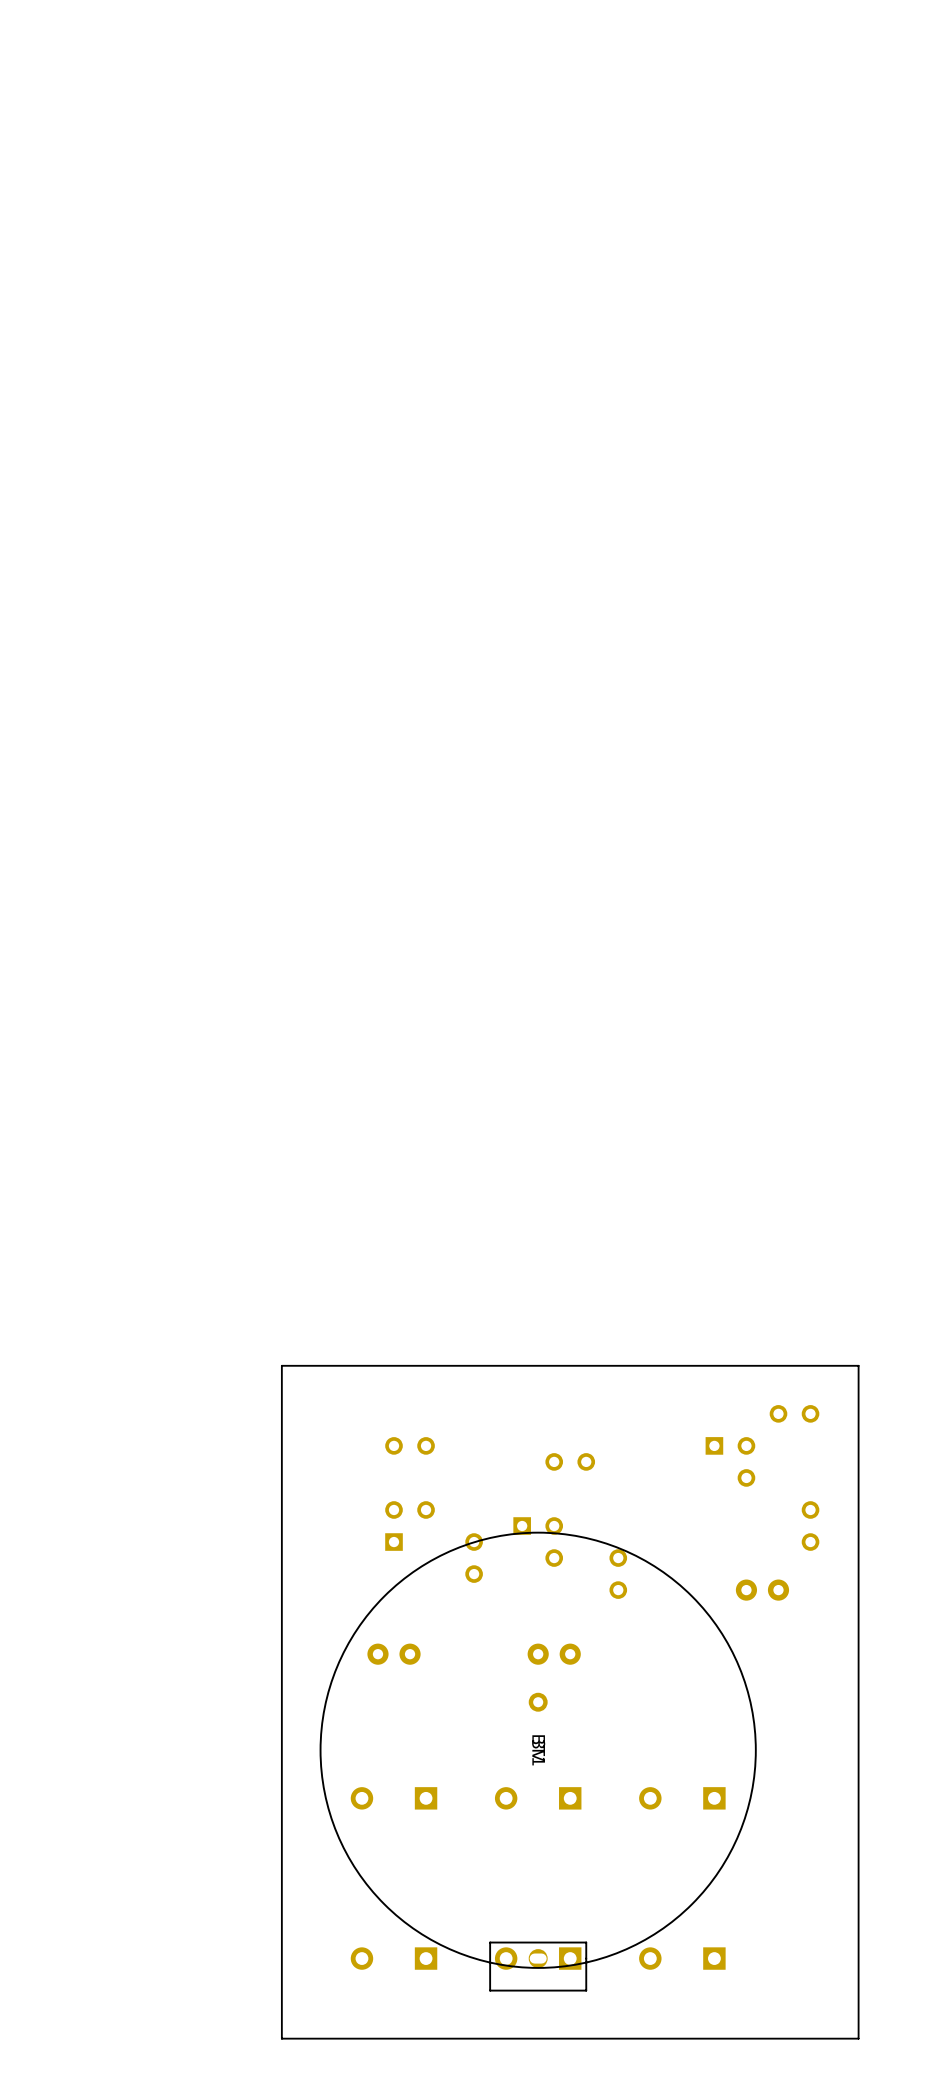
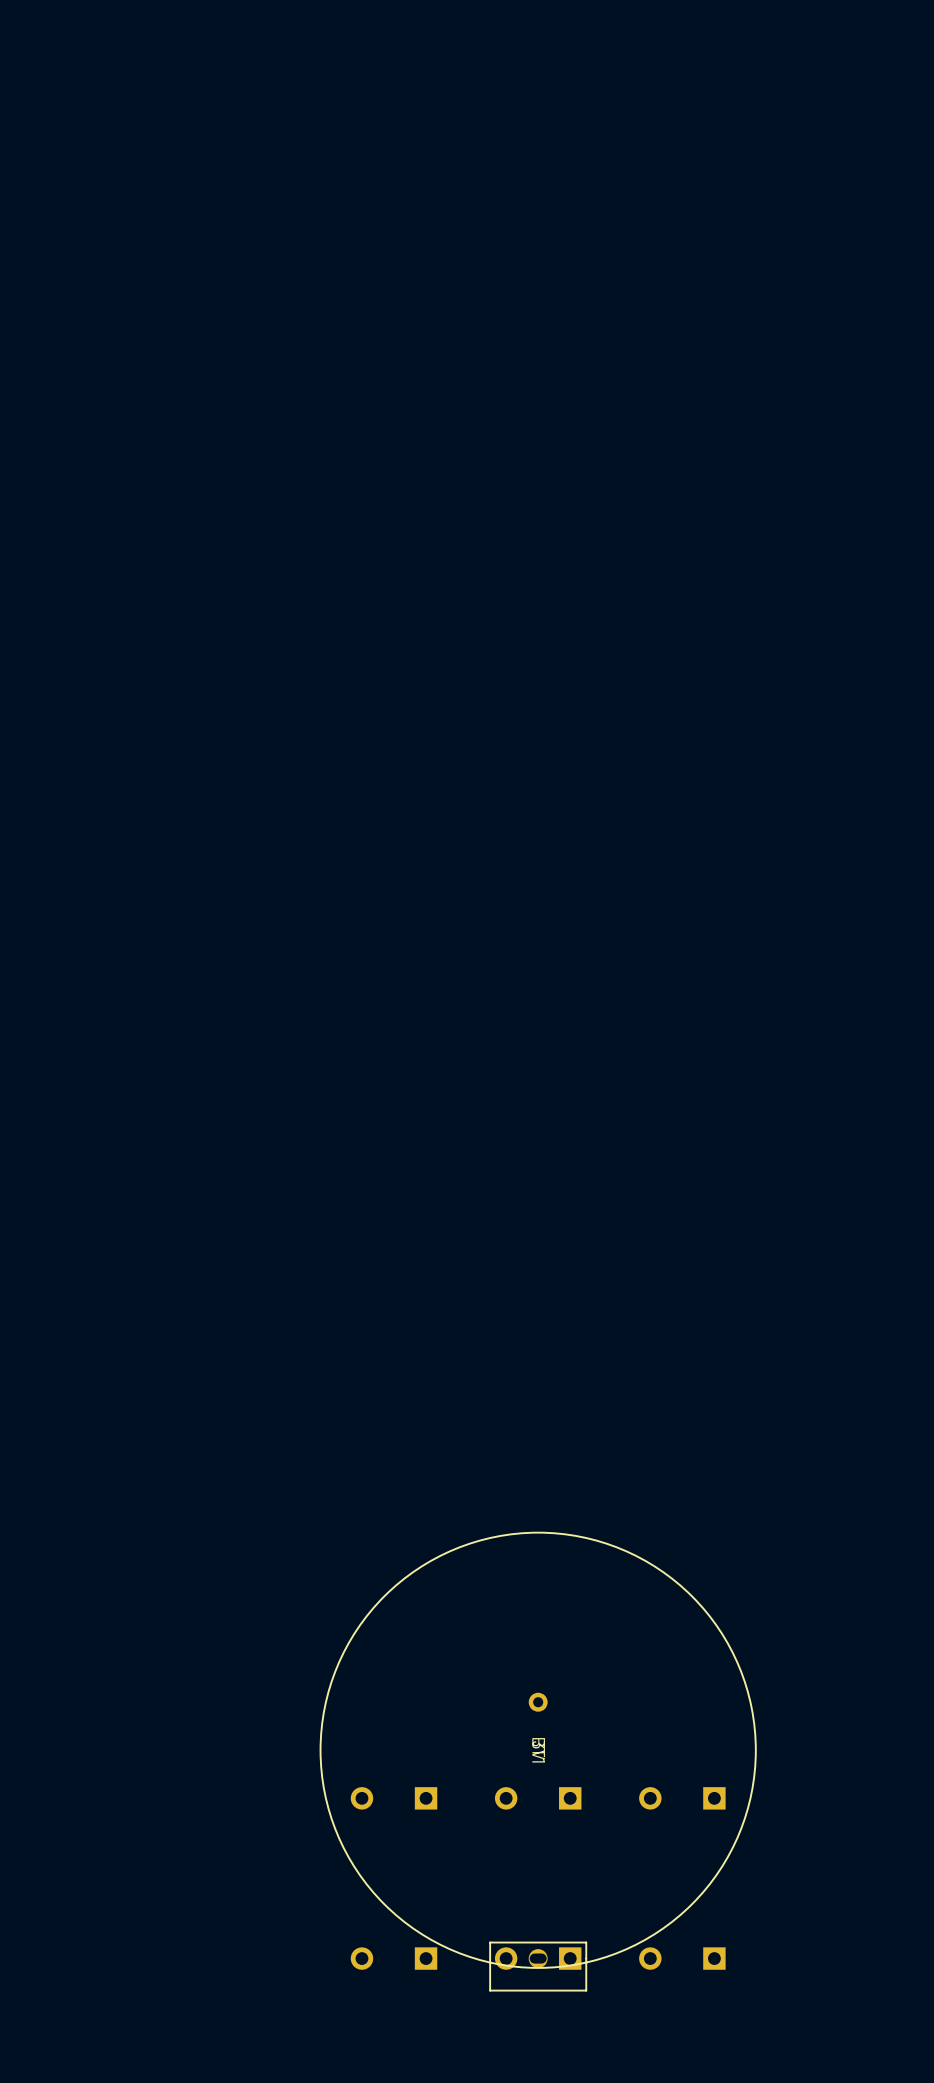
board edge: (858, 1365) (281, 1365) (281, 2038) (858, 2038) (858, 1365) -> none
part: (794, 1413) -> none
part: (410, 1445) -> none
part: (570, 1461) -> none
part: (730, 1461) -> none
part: (410, 1526) -> none
part: (810, 1526) -> none
part: (538, 1542) -> none
part: (474, 1558) -> none
part: (618, 1574) -> none
part: (762, 1590) -> none
part: (394, 1654) -> none
part: (554, 1654) -> none

